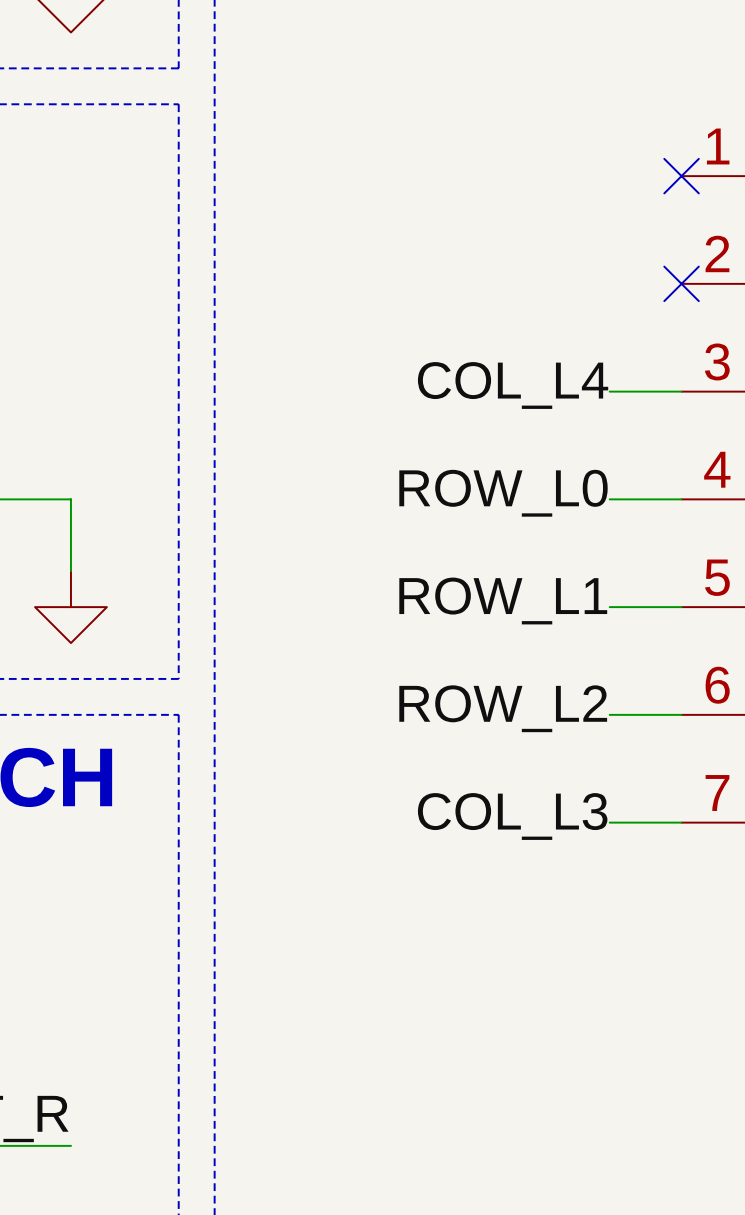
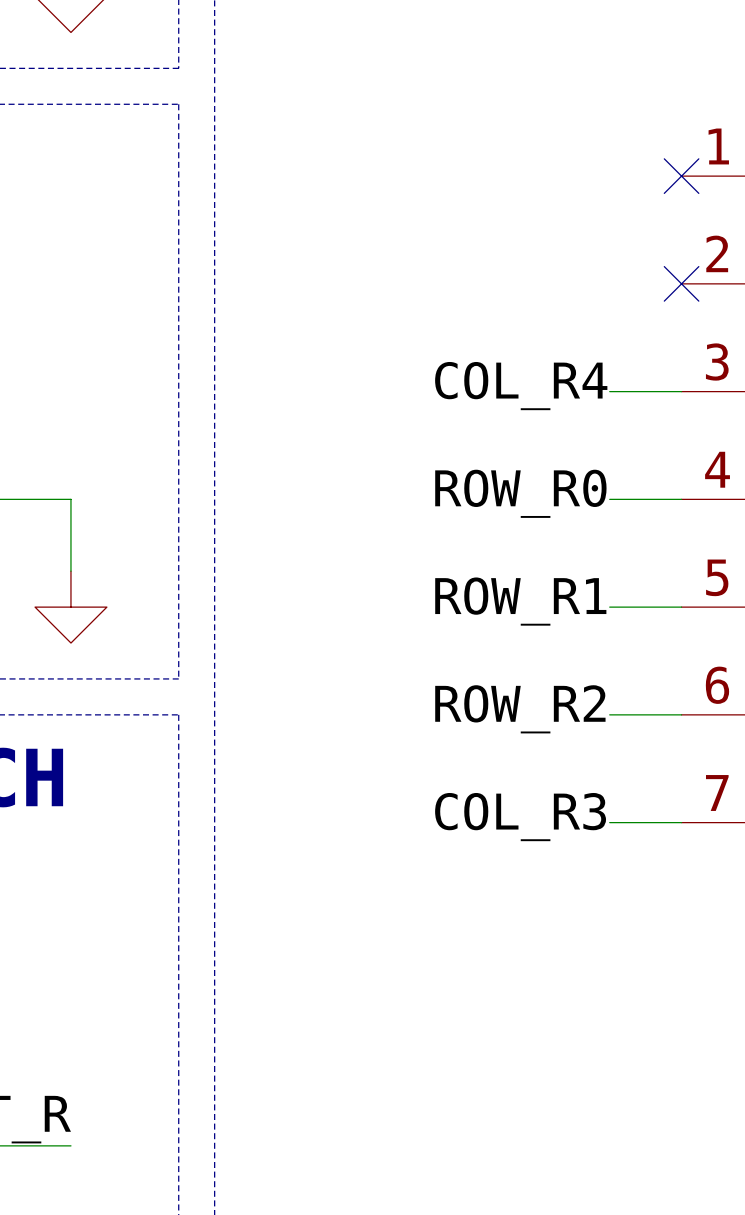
label: COL_L4 (513, 385) -> COL_R4 (521, 386)
label: ROW_L0 (503, 493) -> ROW_R0 (520, 493)
label: ROW_L1 (503, 601) -> ROW_R1 (520, 601)
label: ROW_L2 (503, 708) -> ROW_R2 (520, 709)
label: COL_L3 (512, 816) -> COL_R3 (520, 817)

